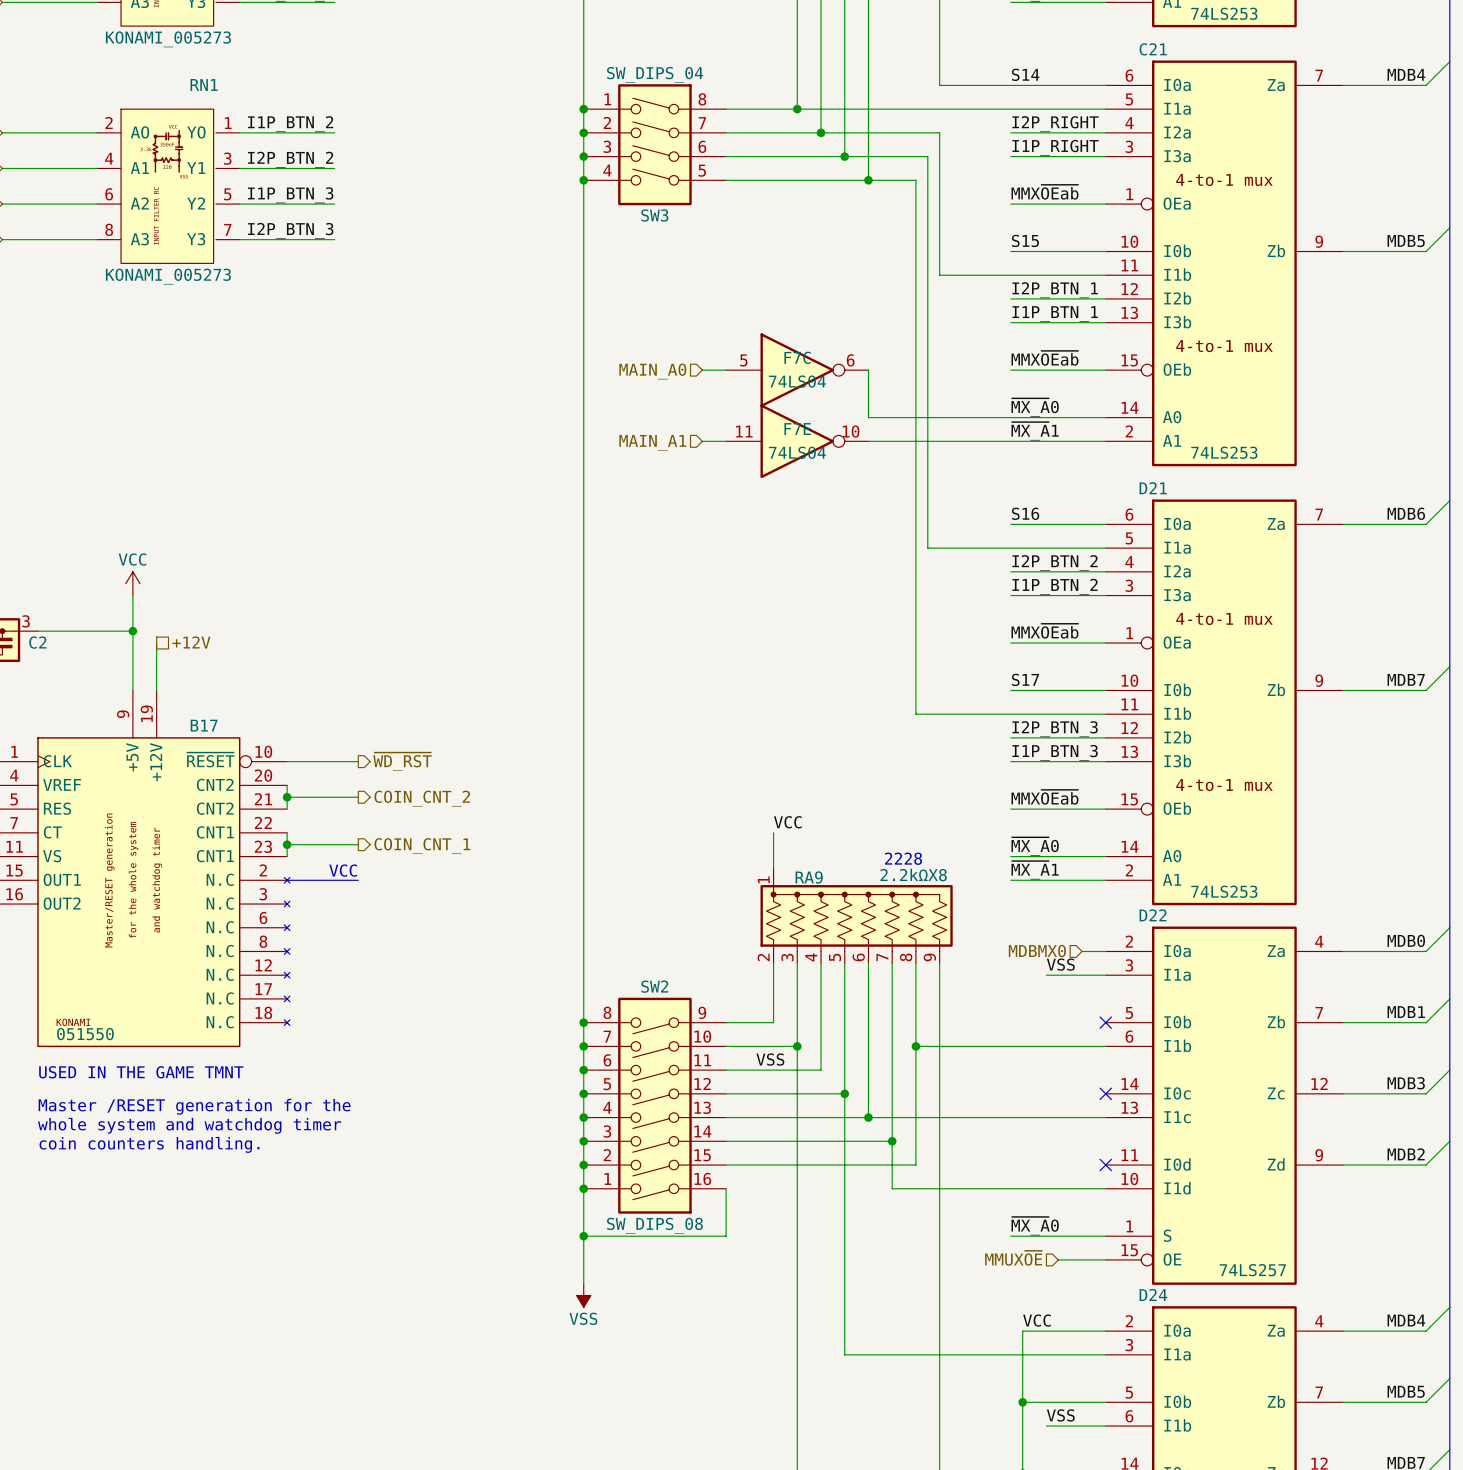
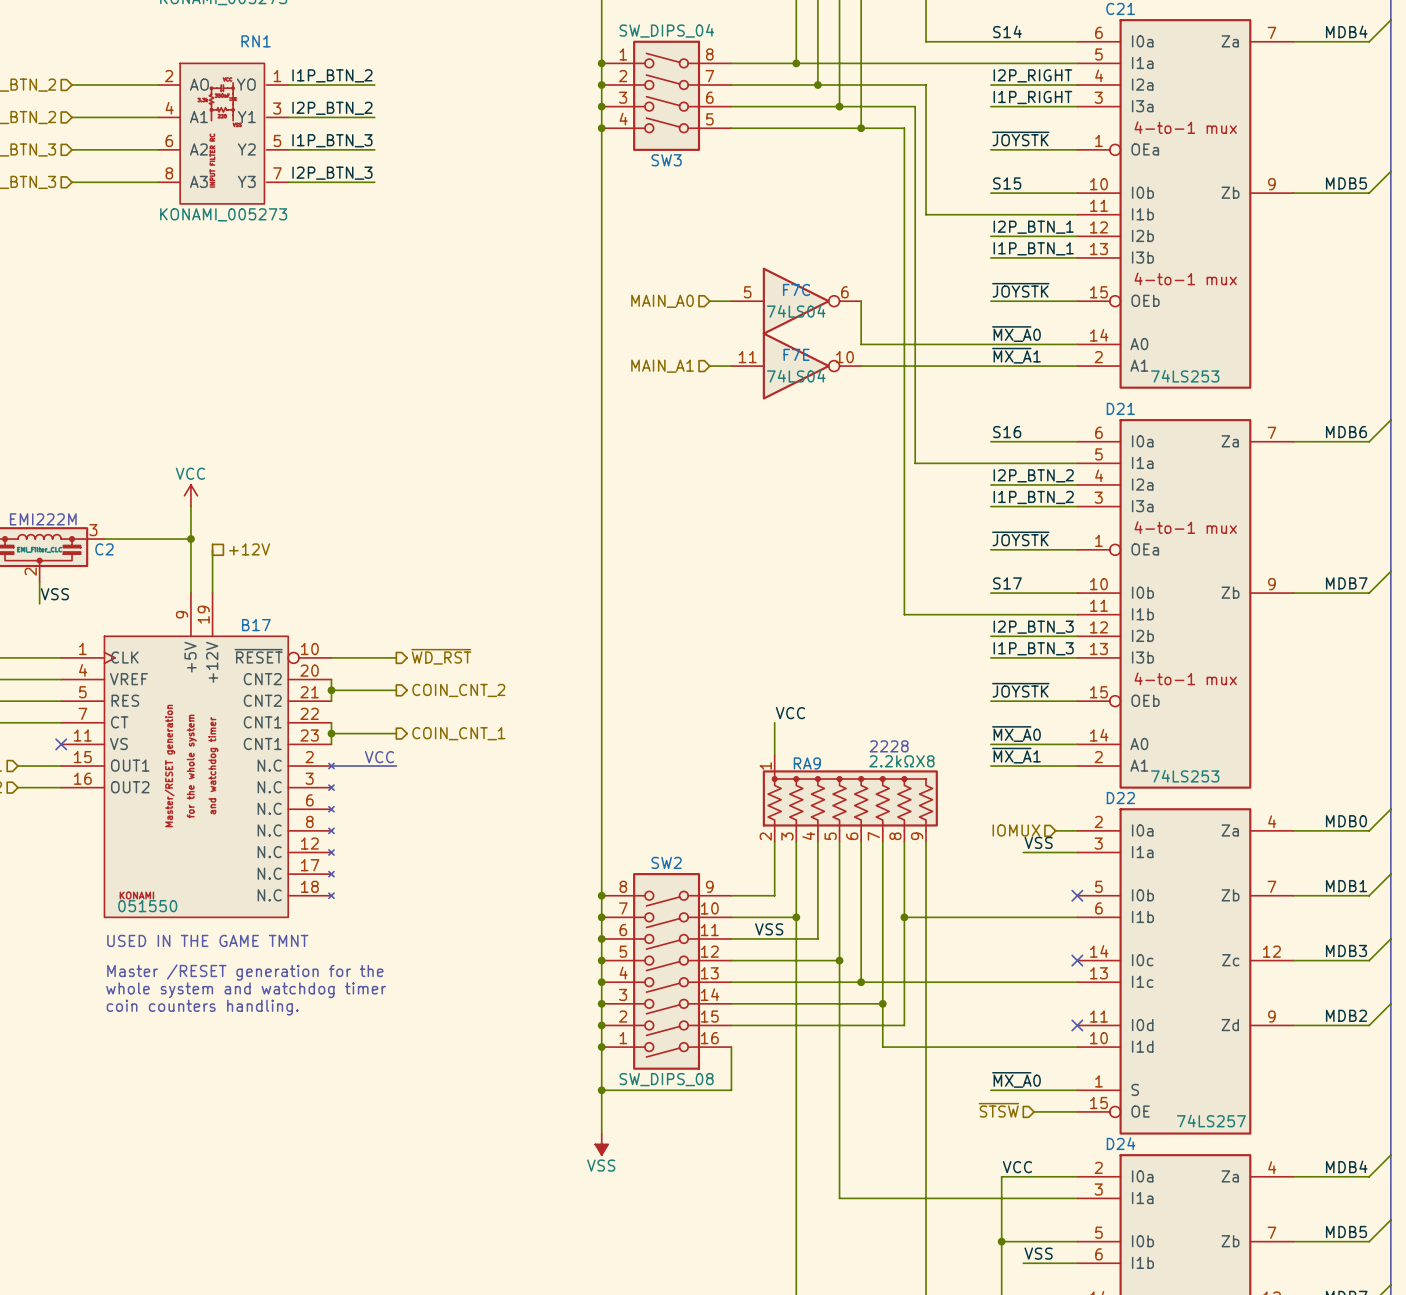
label: MMX~{OEab} (1044, 192) -> ~{JOYSTK} (1020, 138)
label: MMX~{OEab} (1044, 358) -> ~{JOYSTK} (1020, 290)
label: MMX~{OEab} (1044, 631) -> ~{JOYSTK} (1020, 538)
label: MMX~{OEab} (1044, 797) -> ~{JOYSTK} (1020, 690)
hierarchical label: MDBMX0 (1037, 951) -> IOMUX (1016, 830)
hierarchical label: MMUX~{OE} (1013, 1258) -> ~{STSW} (998, 1110)

